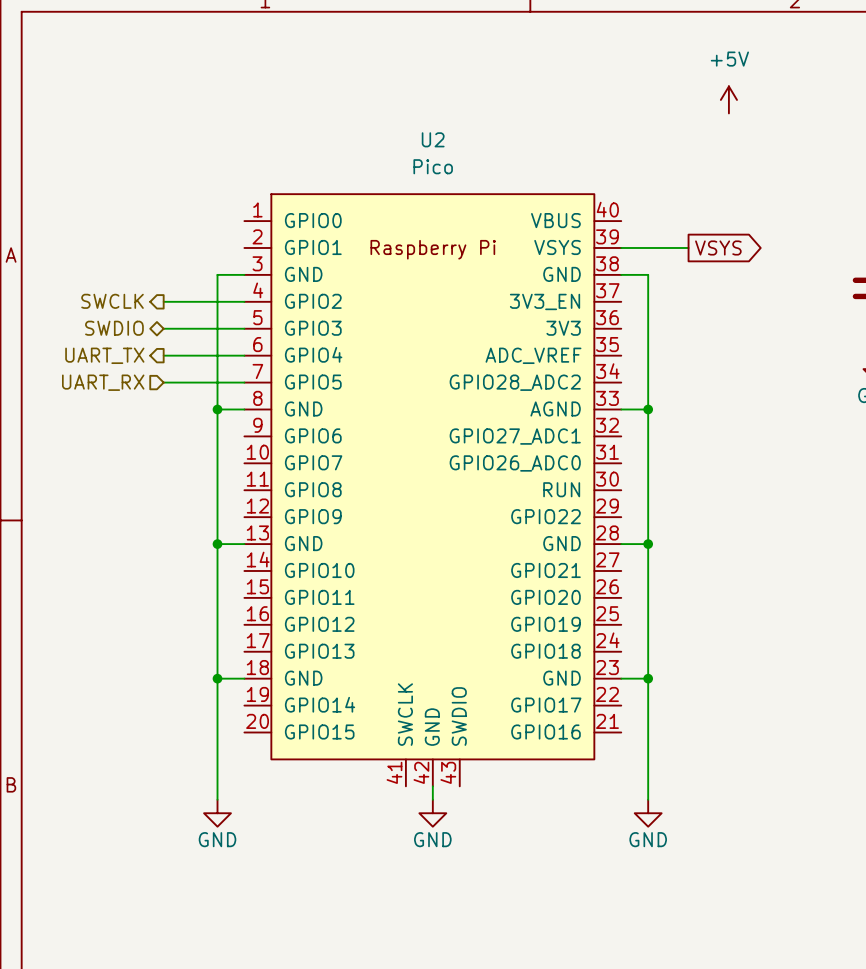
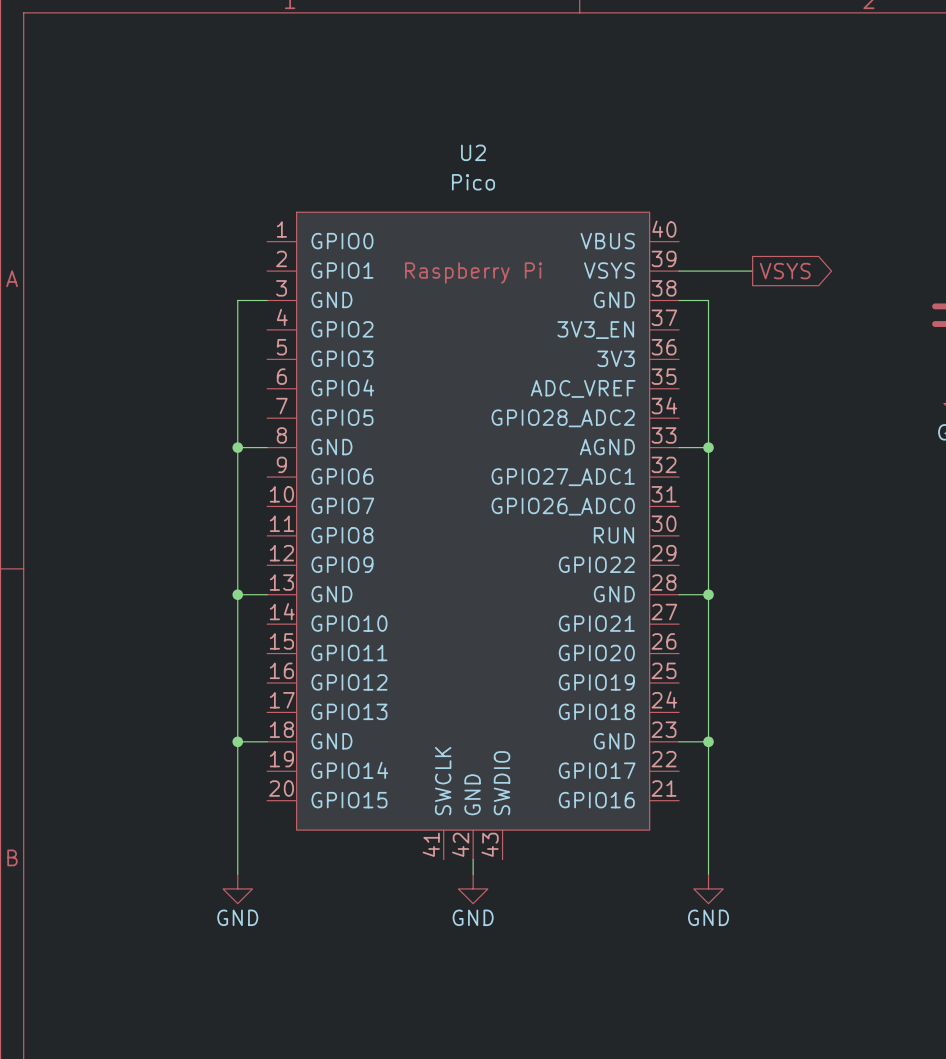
power symbol: +5V (728, 99) -> none
hierarchical label: SWCLK (112, 301) -> none
wire: (163, 301) (244, 301) -> none
hierarchical label: SWDIO (114, 328) -> none
wire: (163, 328) (244, 328) -> none
hierarchical label: UART_TX (104, 355) -> none
wire: (163, 355) (244, 355) -> none
hierarchical label: UART_RX (103, 382) -> none
wire: (163, 382) (244, 382) -> none

